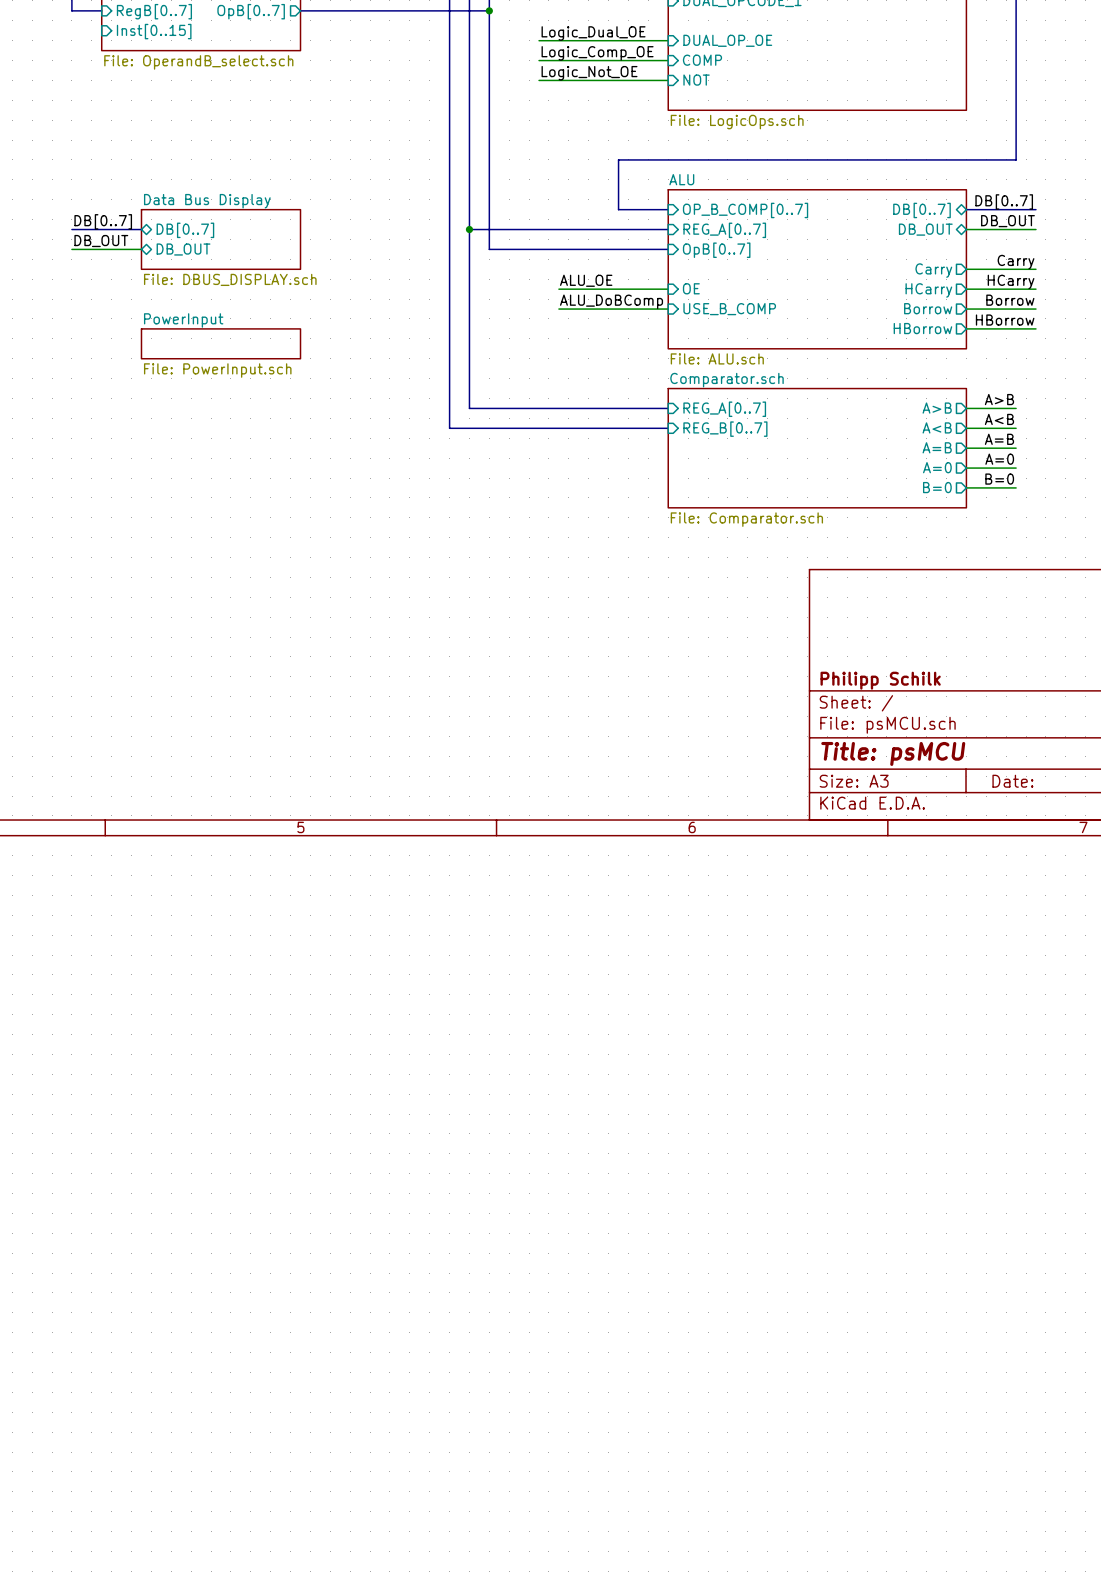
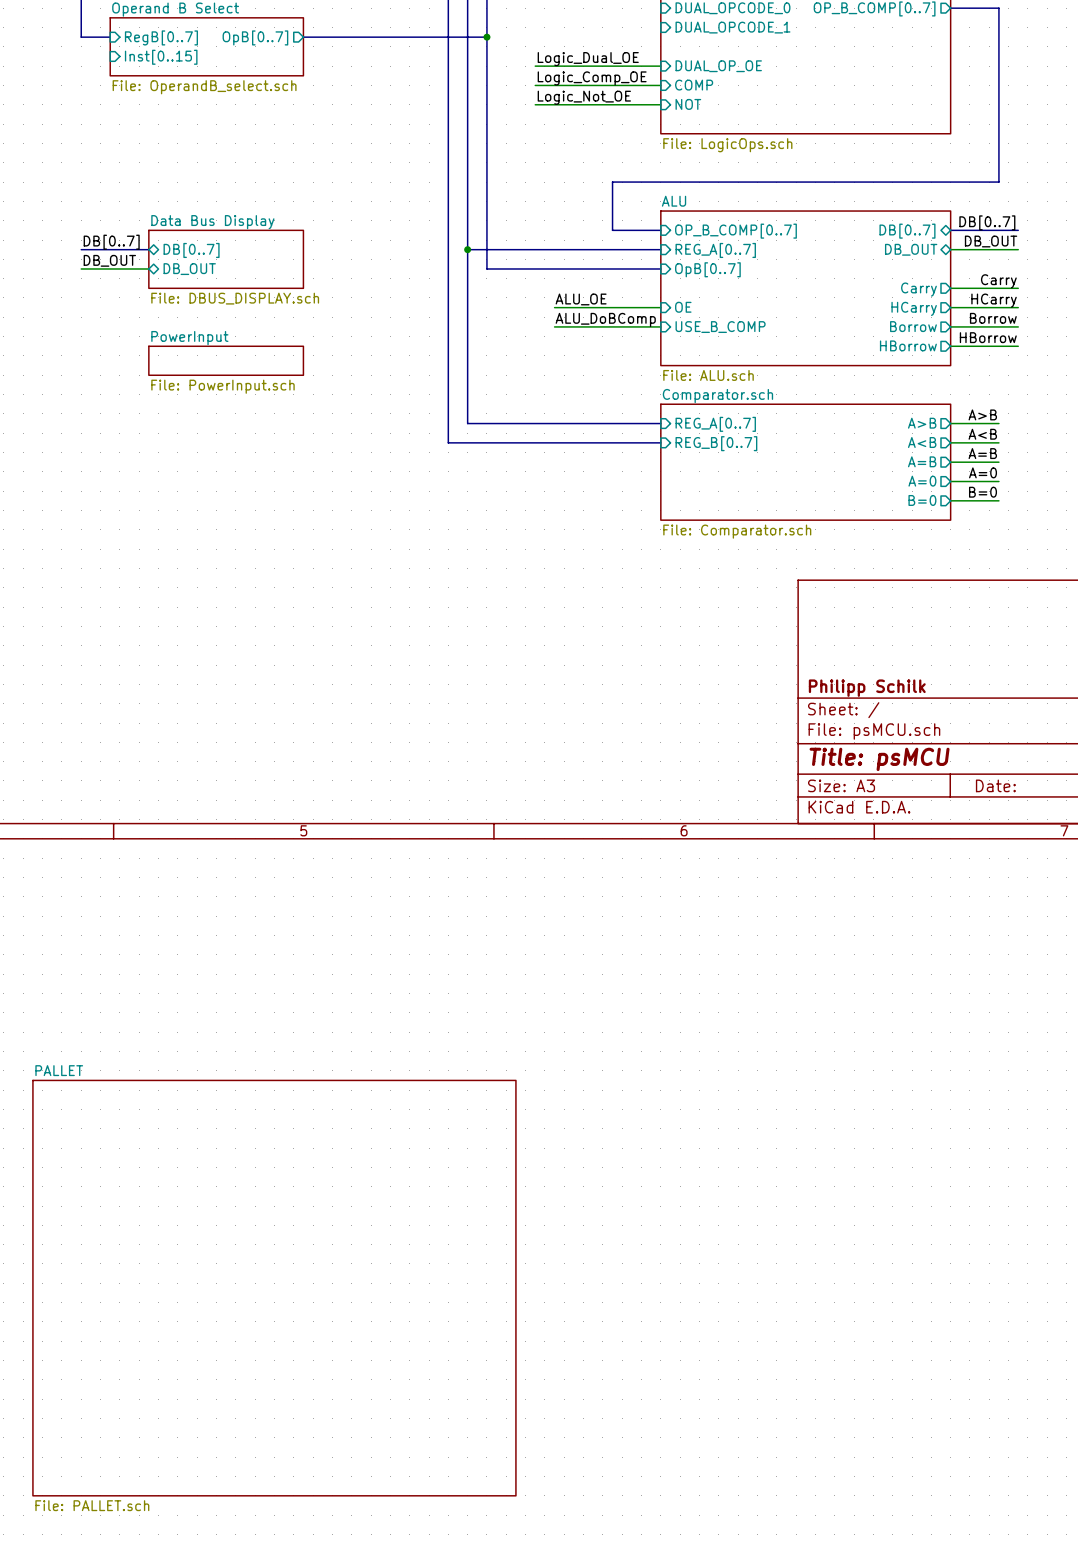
sheet PALLET: none -> File: PALLET.sch (274, 1288)

